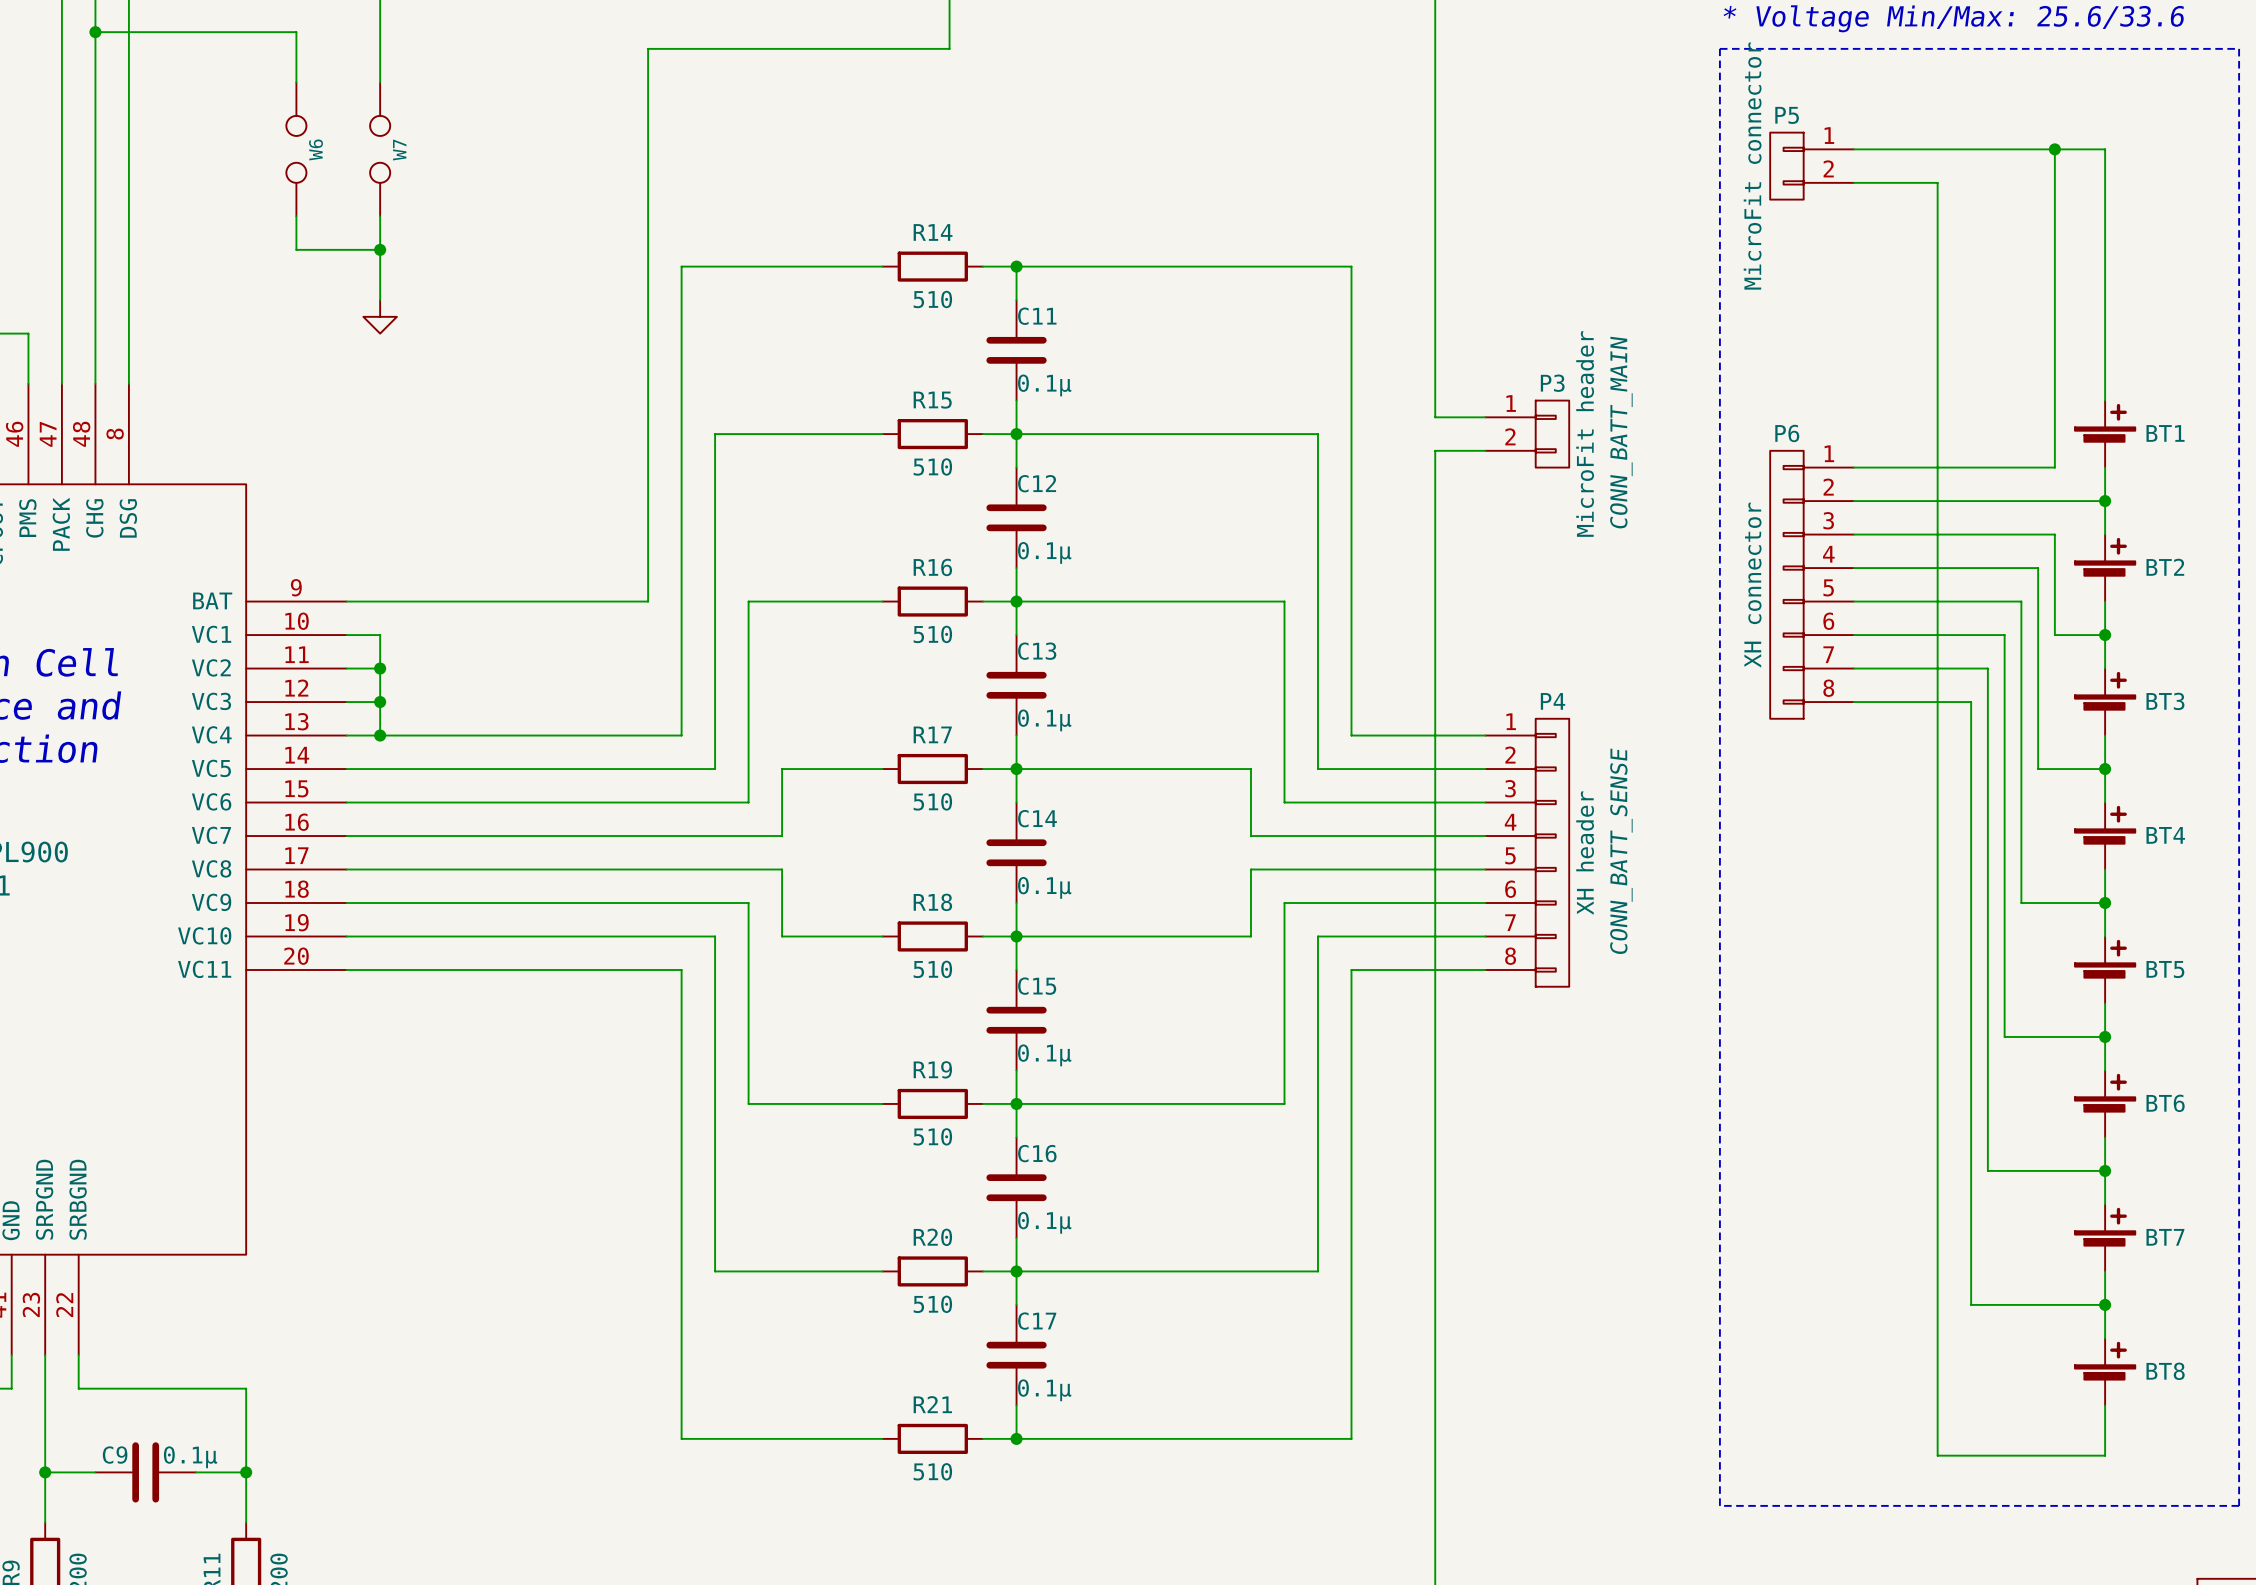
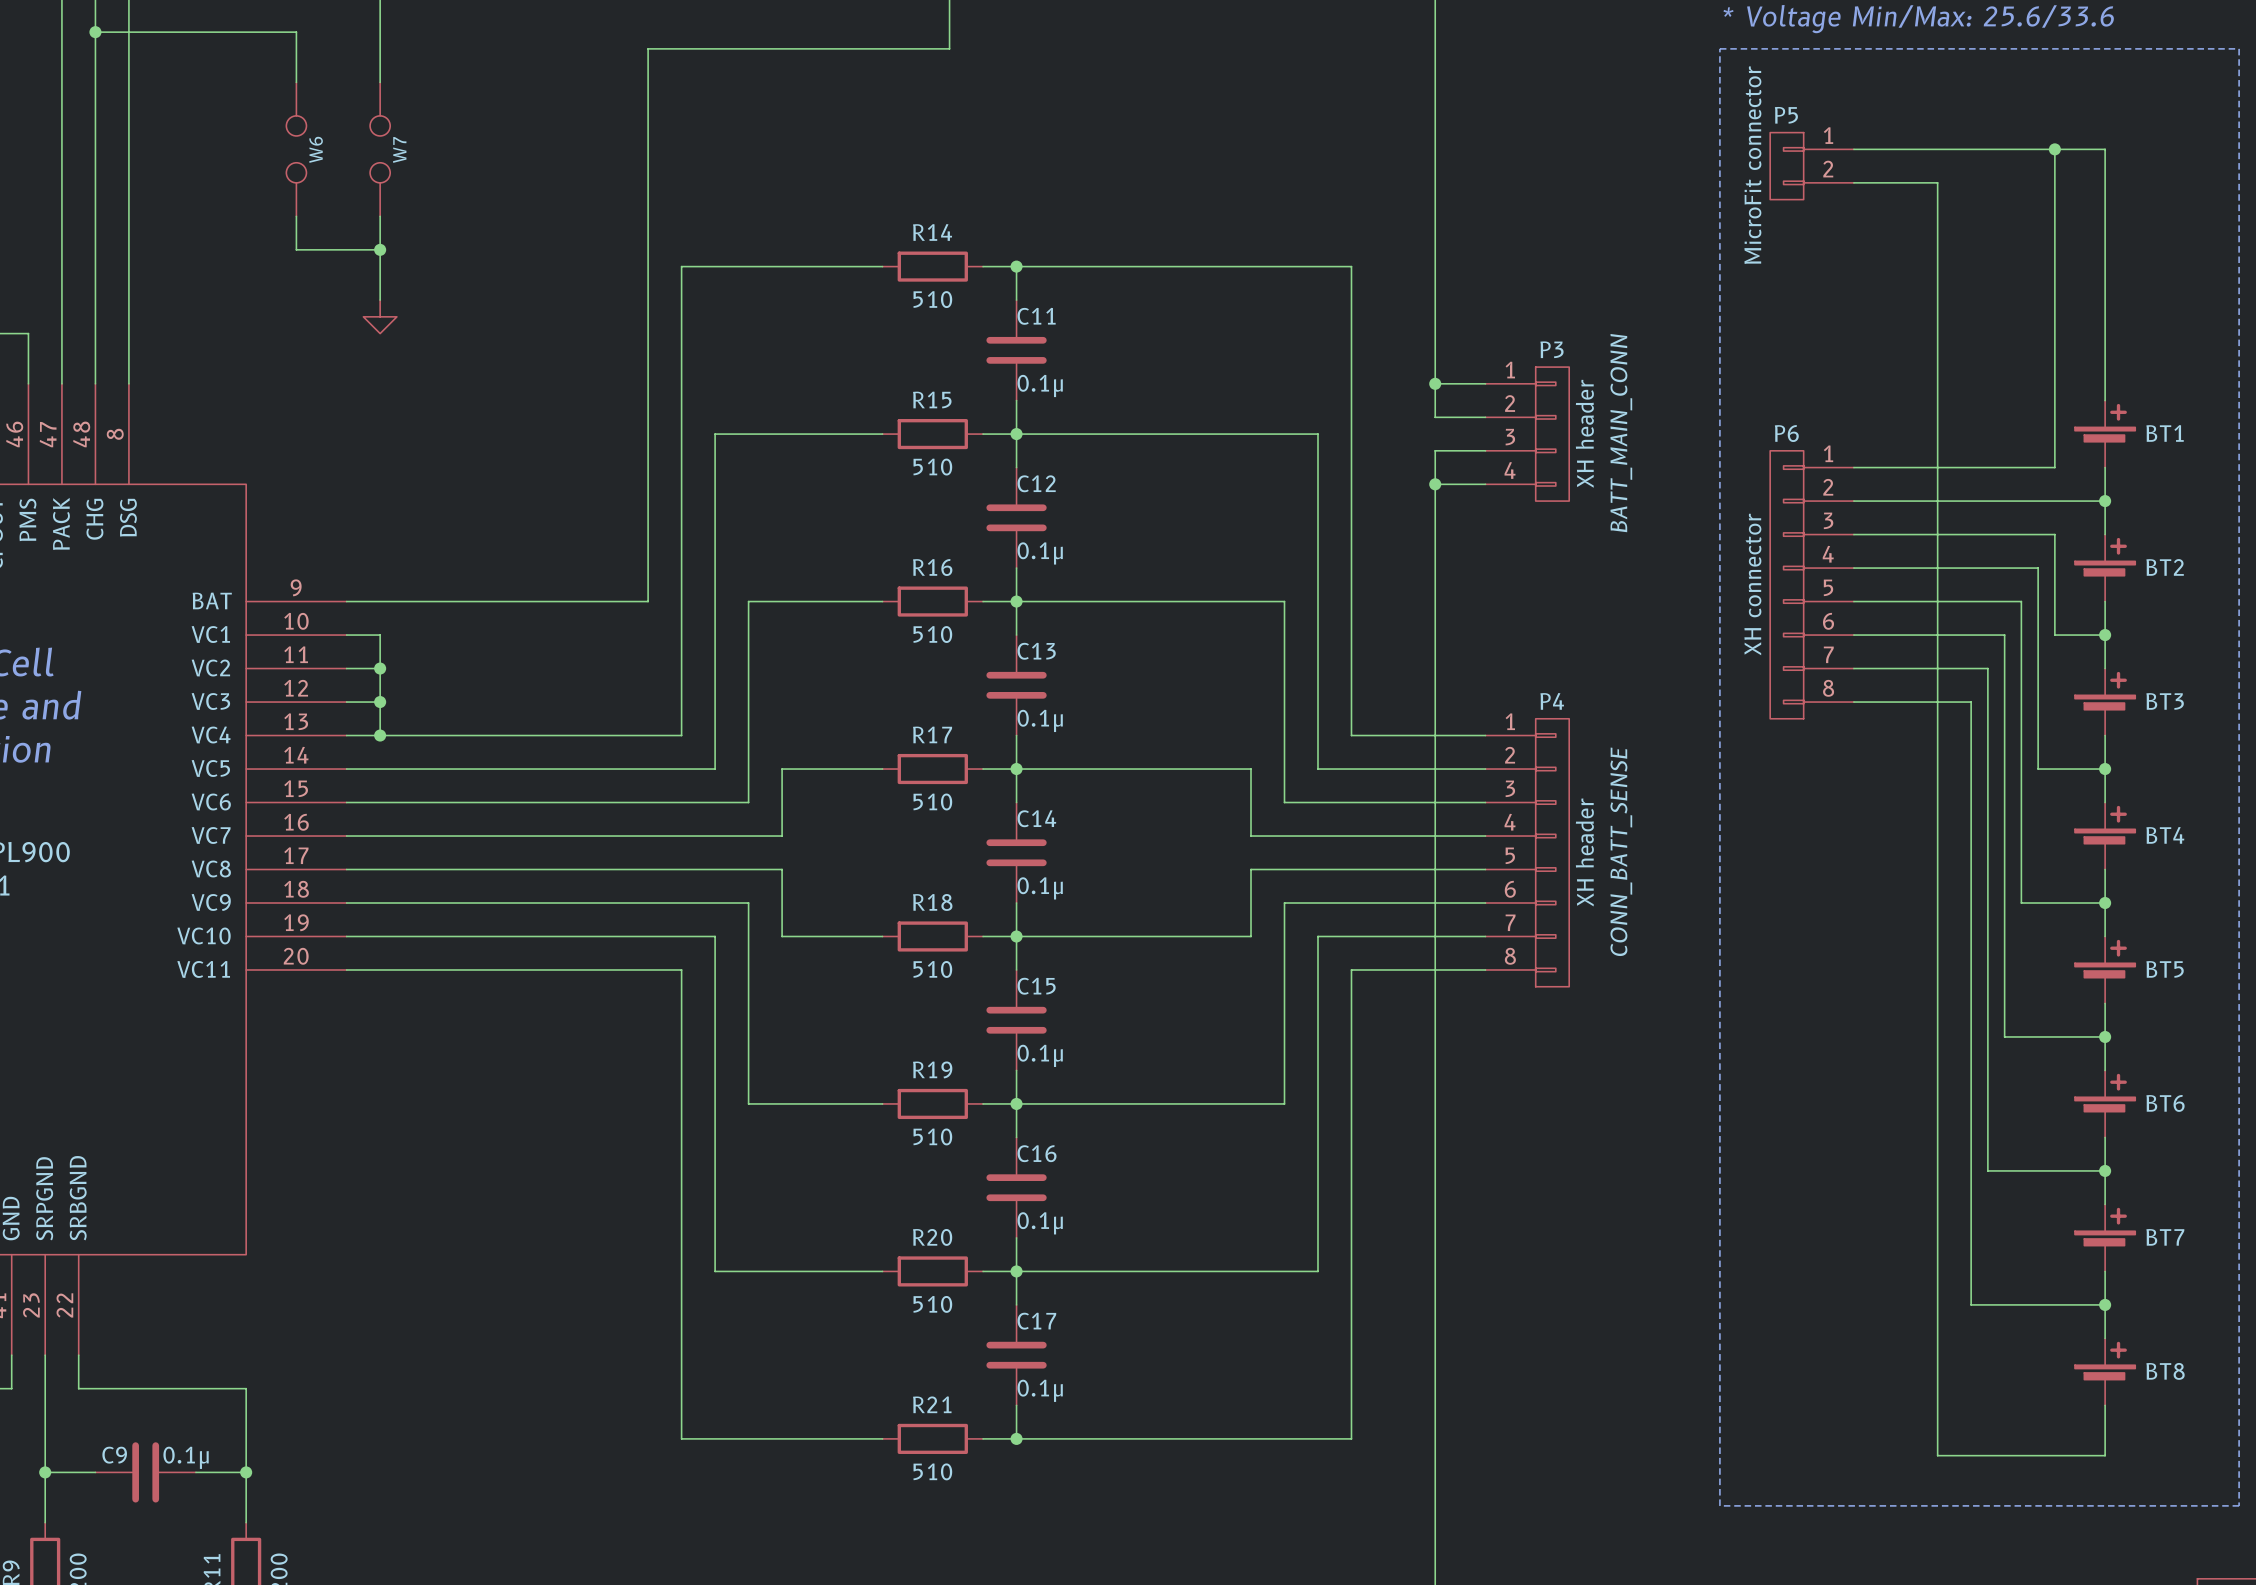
wire: none -> (1435, 383) (1485, 383)
junction: none -> (1435, 383)
P3 name position: P3 (1552, 383) -> P3 (1551, 349)
P3 symbol: [1485, 400, 1570, 468] -> [1485, 367, 1570, 502]
P3 text: CONN_BATT_MAIN (1621, 432) -> BATT_MAIN_CONN (1621, 433)
P3 value: MicroFit header (1585, 434) -> XH header (1584, 433)
wire: none -> (1435, 484) (1485, 484)
junction: none -> (1435, 484)

